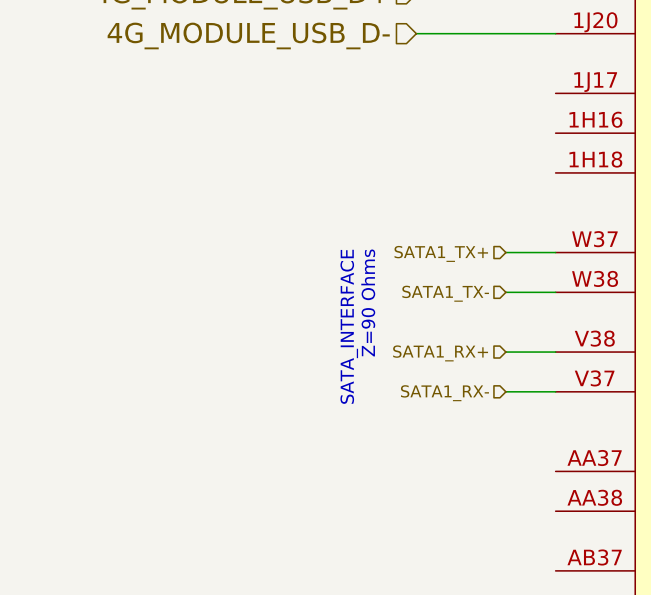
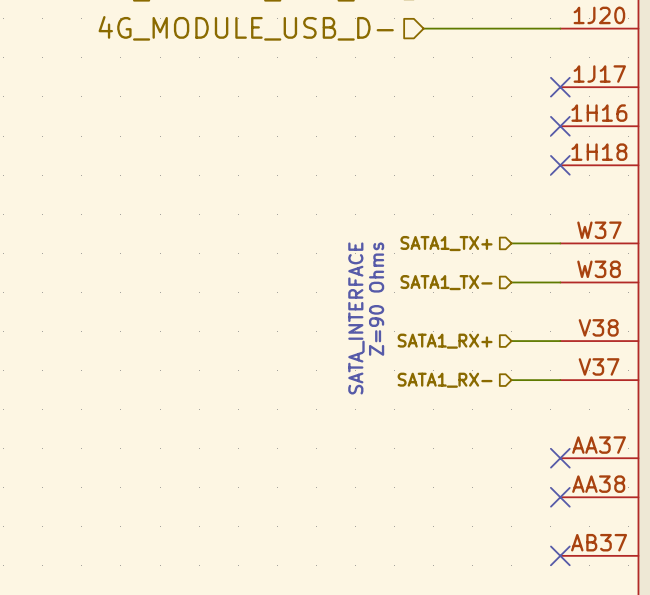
no-connect mark: none -> (560, 87)
no-connect mark: none -> (560, 126)
no-connect mark: none -> (560, 165)
no-connect mark: none -> (560, 458)
no-connect mark: none -> (560, 497)
no-connect mark: none -> (560, 555)

